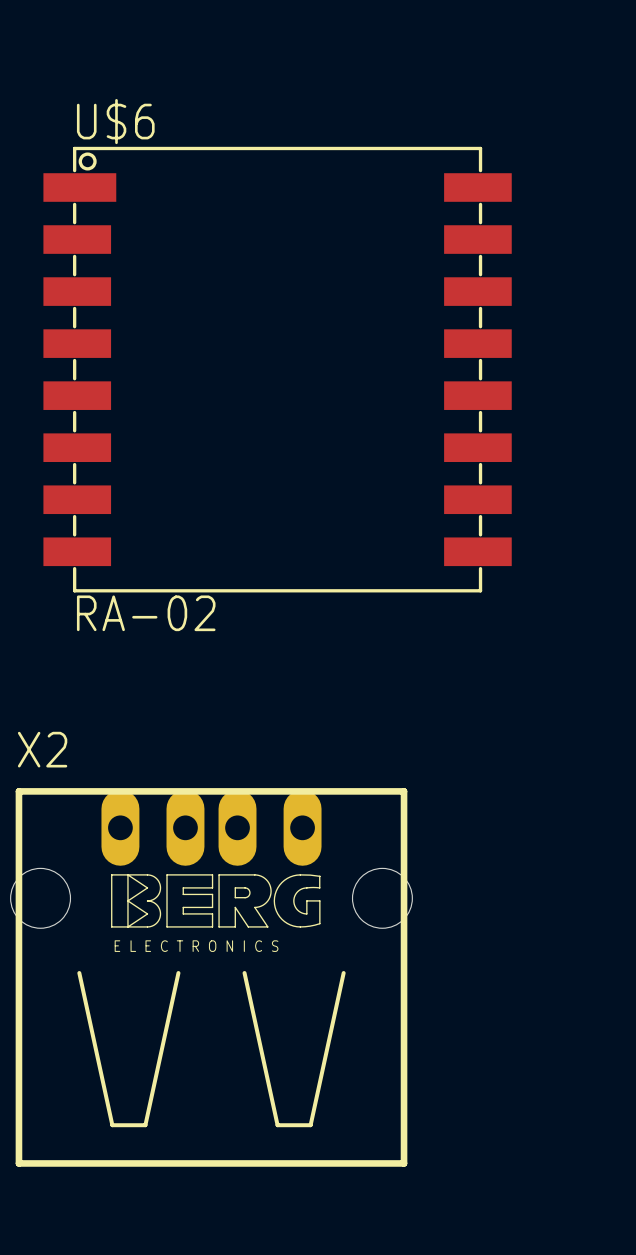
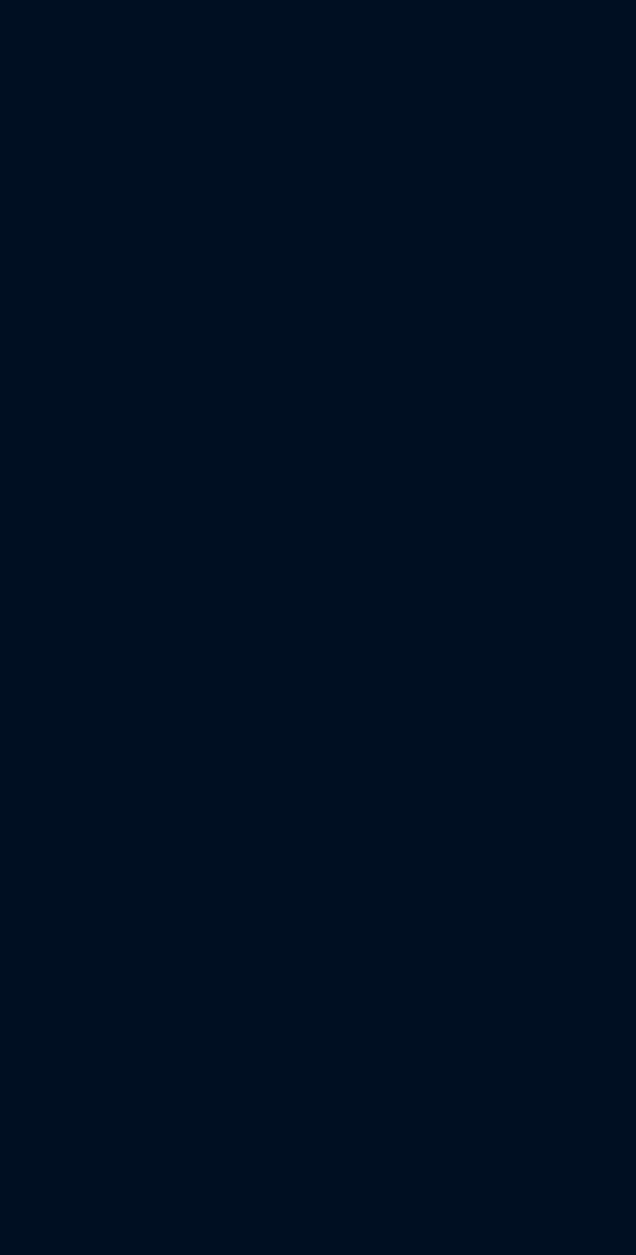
U$6: RA-02 (277, 369) -> none
X2: (211, 977) -> none

